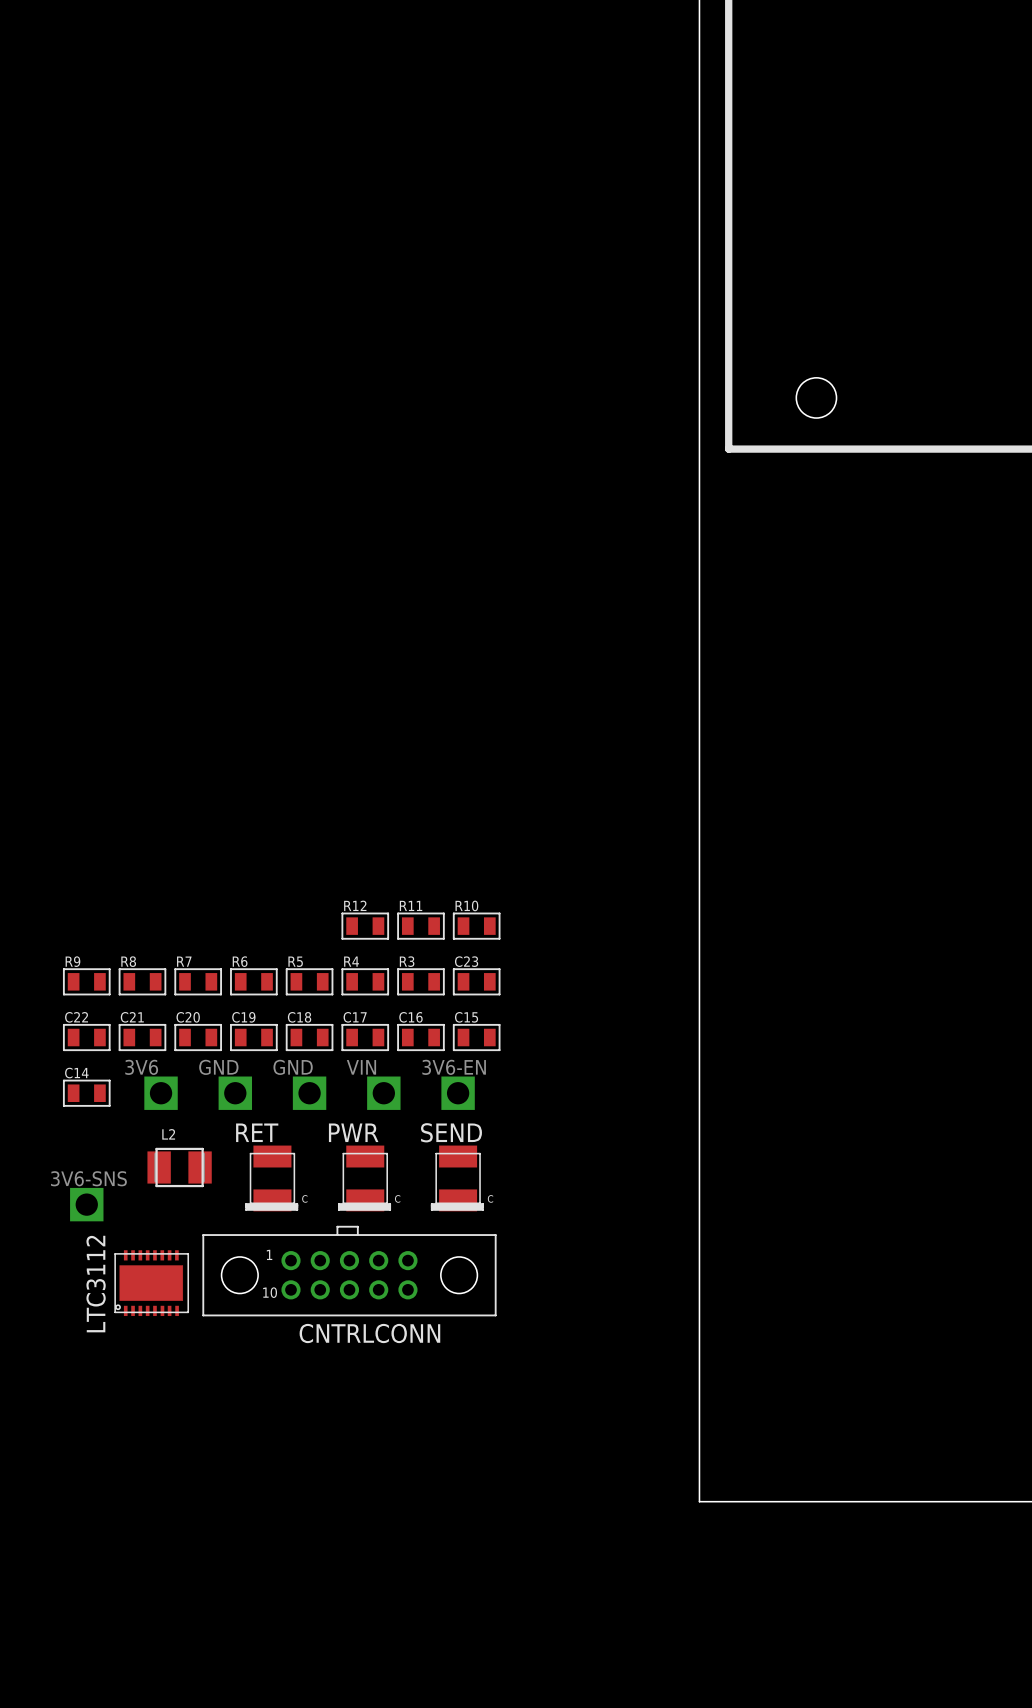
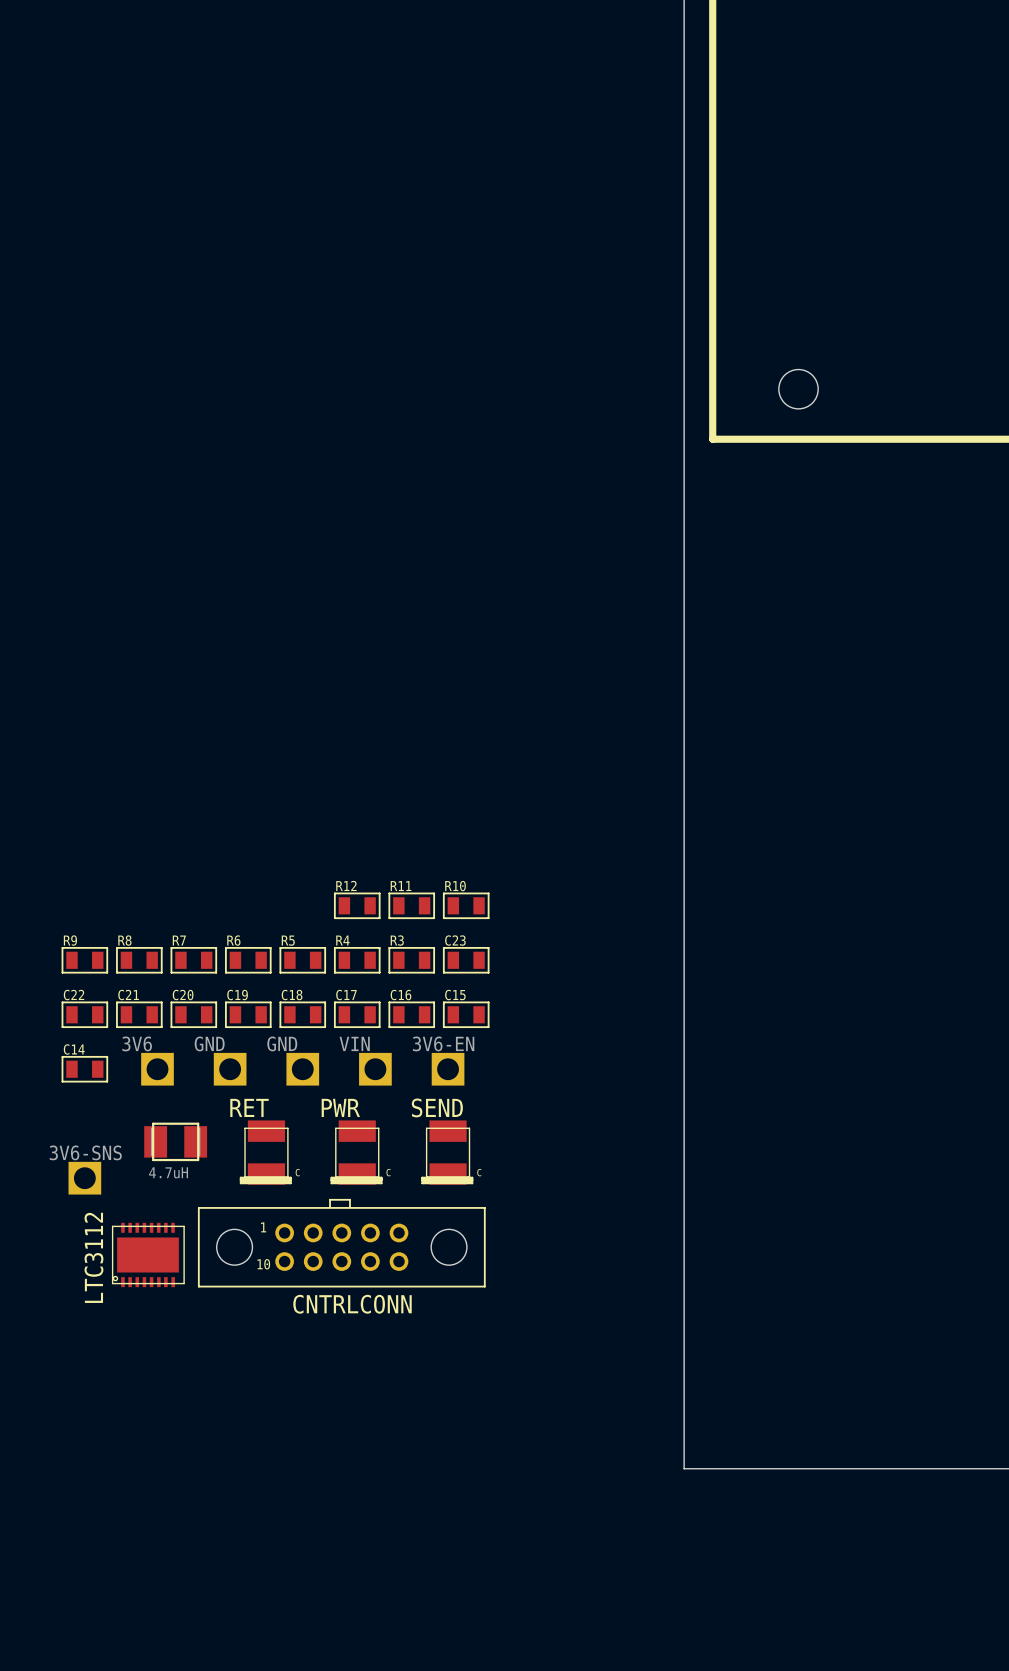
L2 name: L2 (168, 1134) -> none
L2 value: none -> 4.7uH (168, 1172)

